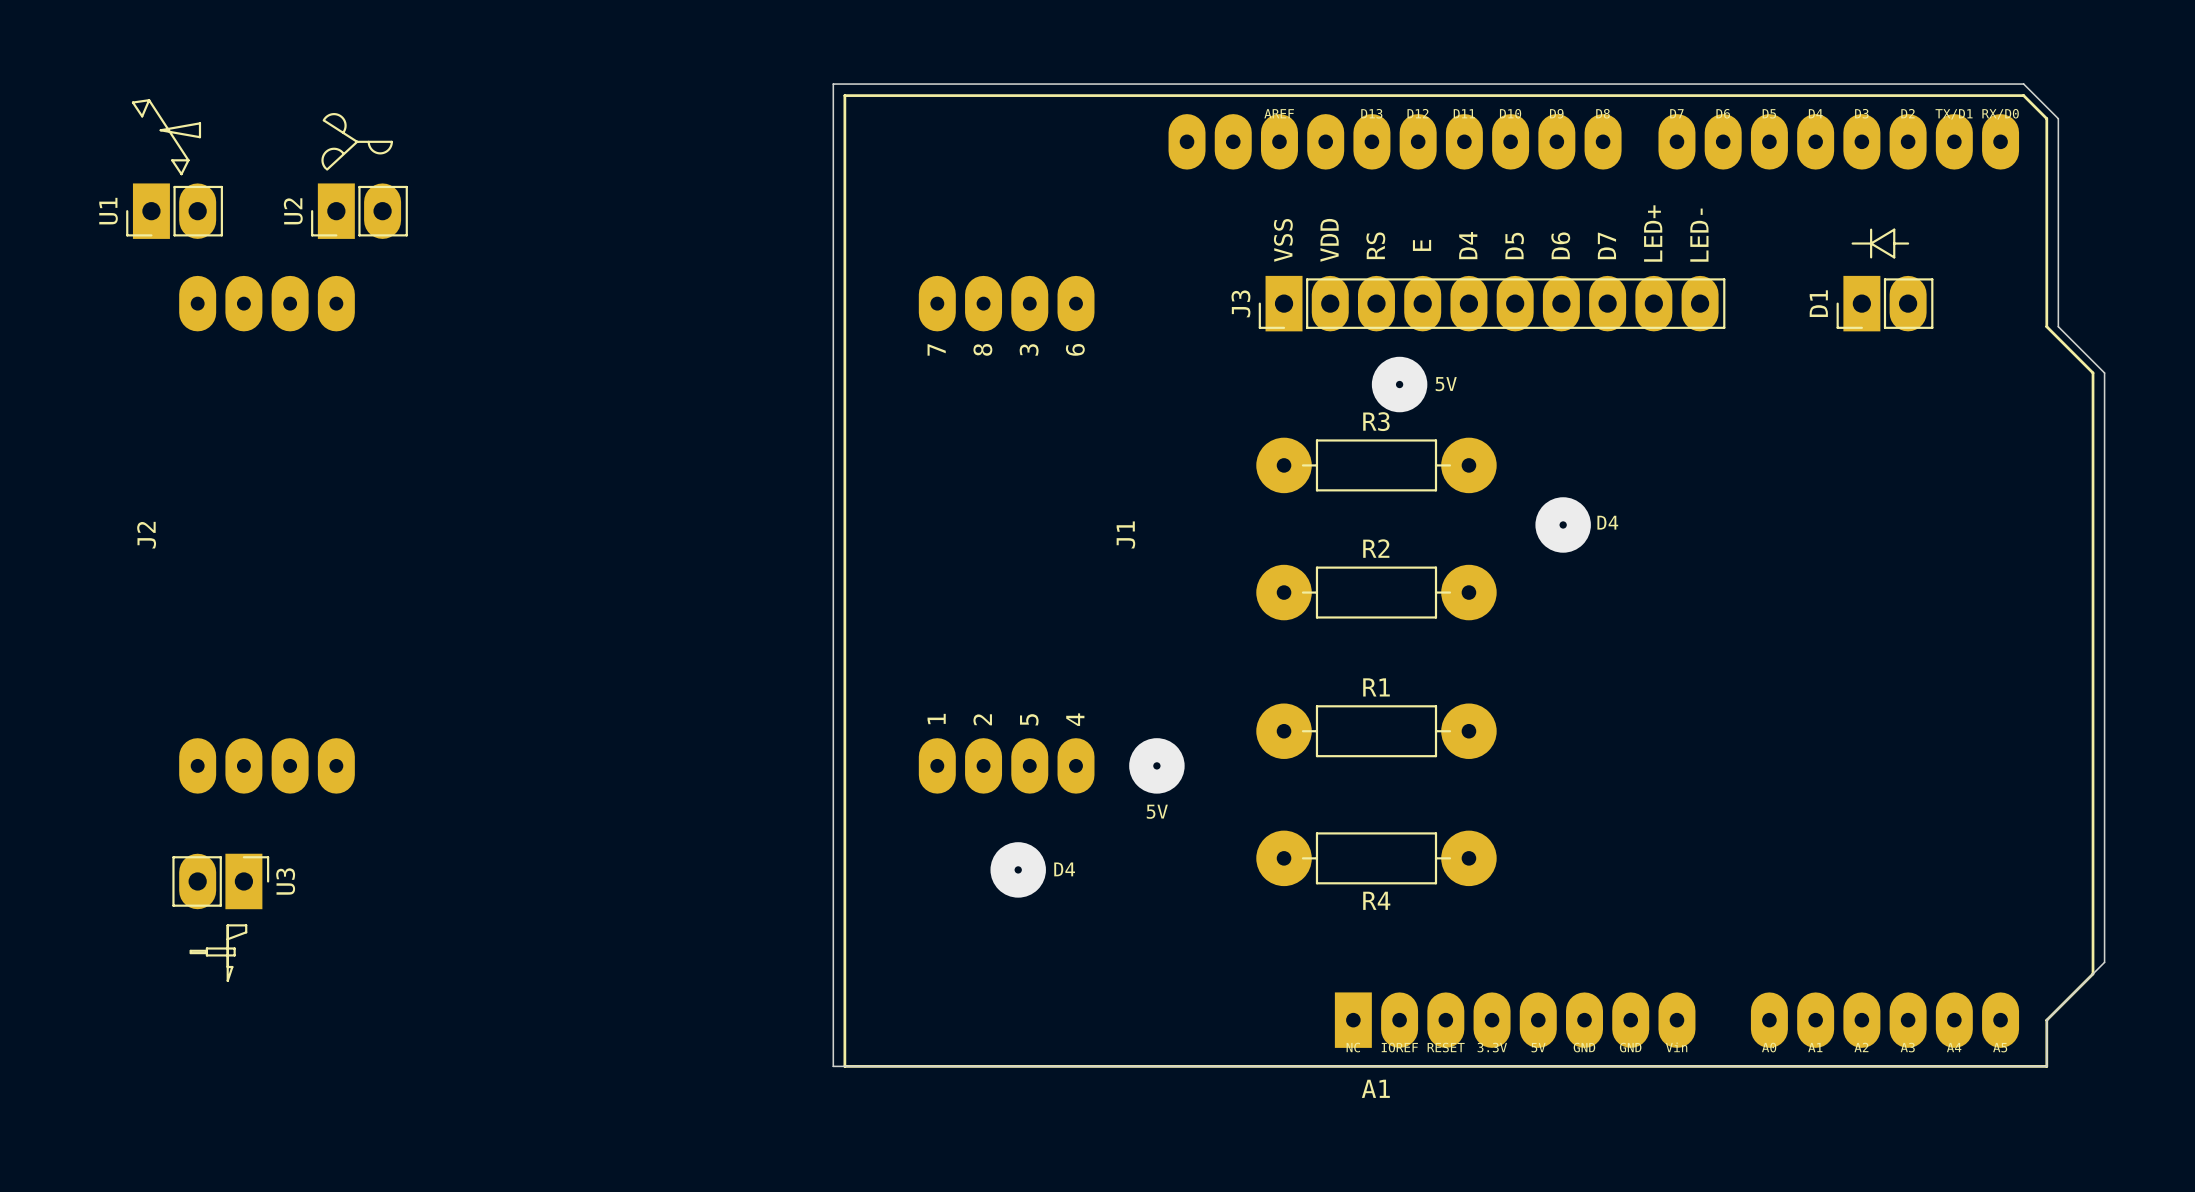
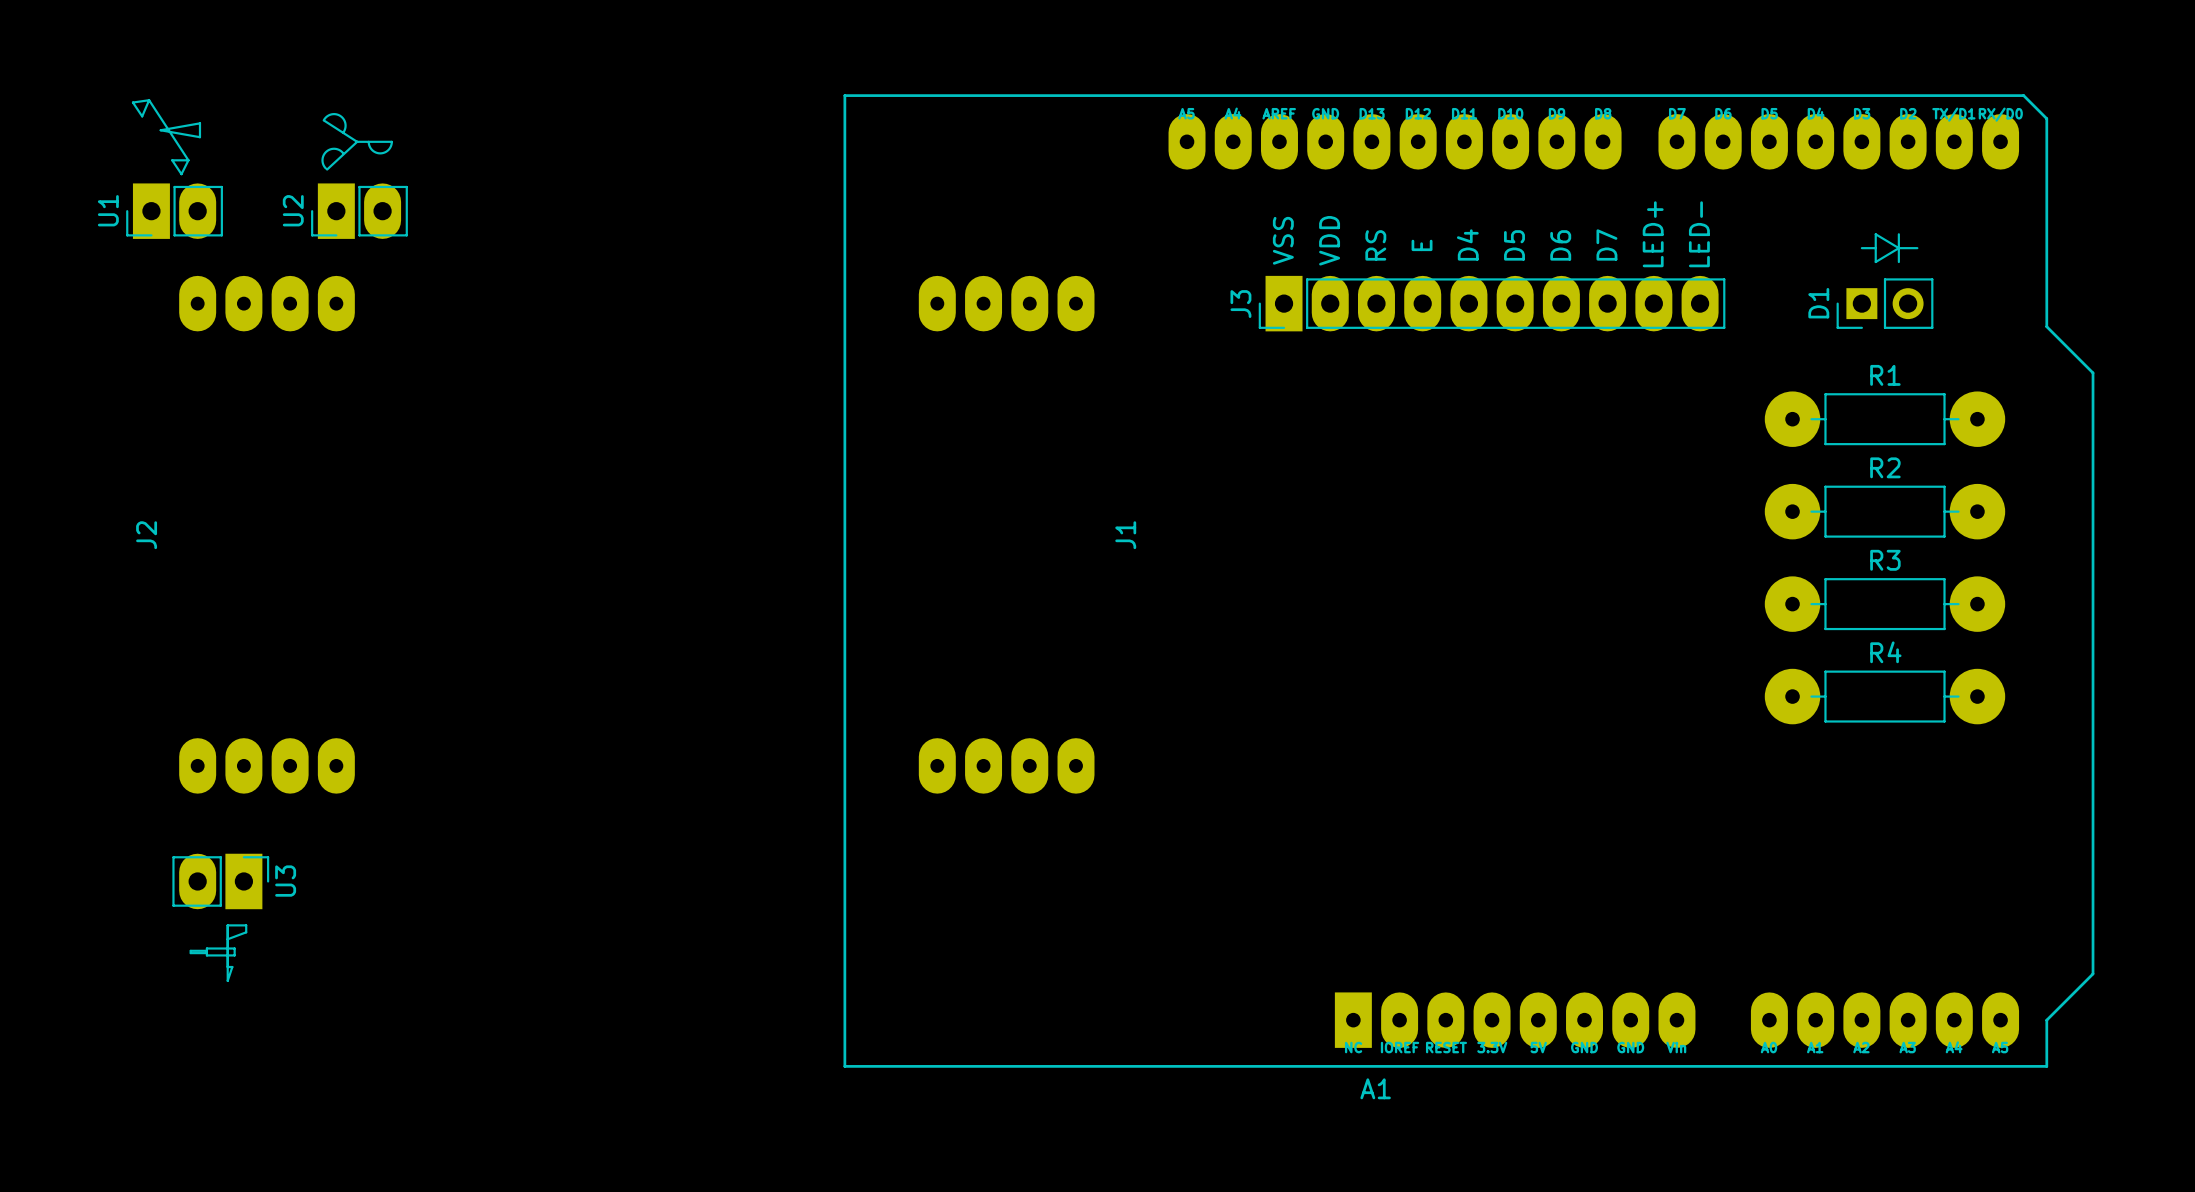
board edge: (833, 84) (2023, 84) (2058, 118) (2058, 326) (2104, 372) (2104, 962) (2046, 1020) (2046, 1066) (833, 1066) (833, 84) -> none
A1 text: none -> A5 (1186, 113)
A1 text: none -> A4 (1232, 113)
A1 text: none -> GND (1325, 113)
D1 footprint: [1836, 228, 1934, 332] -> [1836, 233, 1934, 329]
J1 text: 7 (936, 349) -> none
J1 text: 8 (982, 349) -> none
J1 text: 3 (1029, 349) -> none
J1 text: 6 (1075, 349) -> none
via: (1399, 384) -> none
text: 5V (1446, 384) -> none
R3 position: (1376, 465) -> (1884, 604)
text: D4 (1607, 522) -> none
via: (1563, 524) -> none
R2 position: (1376, 592) -> (1884, 511)
J1 text: 1 (936, 719) -> none
J1 text: 2 (982, 719) -> none
J1 text: 5 (1029, 719) -> none
J1 text: 4 (1075, 719) -> none
R1 position: (1376, 731) -> (1884, 419)
via: (1156, 765) -> none
text: 5V (1157, 811) -> none
R4 position: (1376, 858) -> (1884, 696)
via: (1018, 869) -> none
text: D4 (1064, 869) -> none
R4 name position: R4 (1376, 900) -> R4 (1885, 652)

